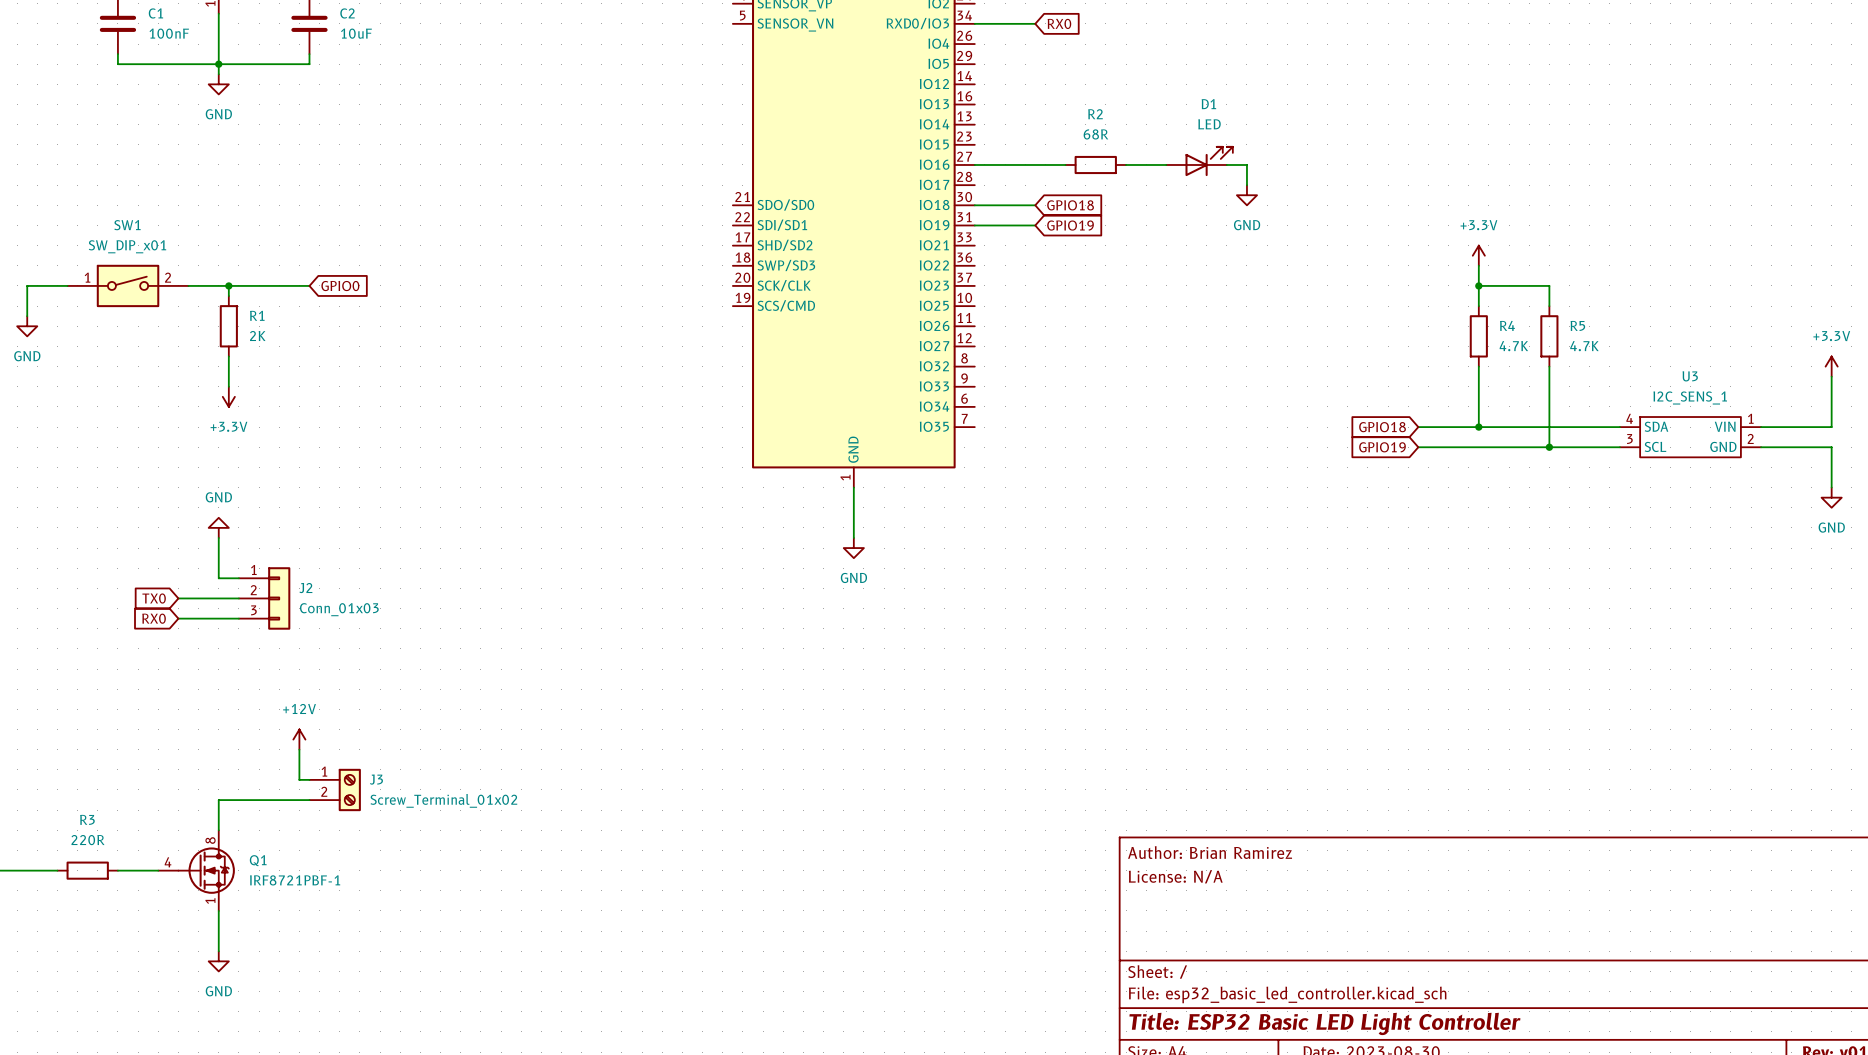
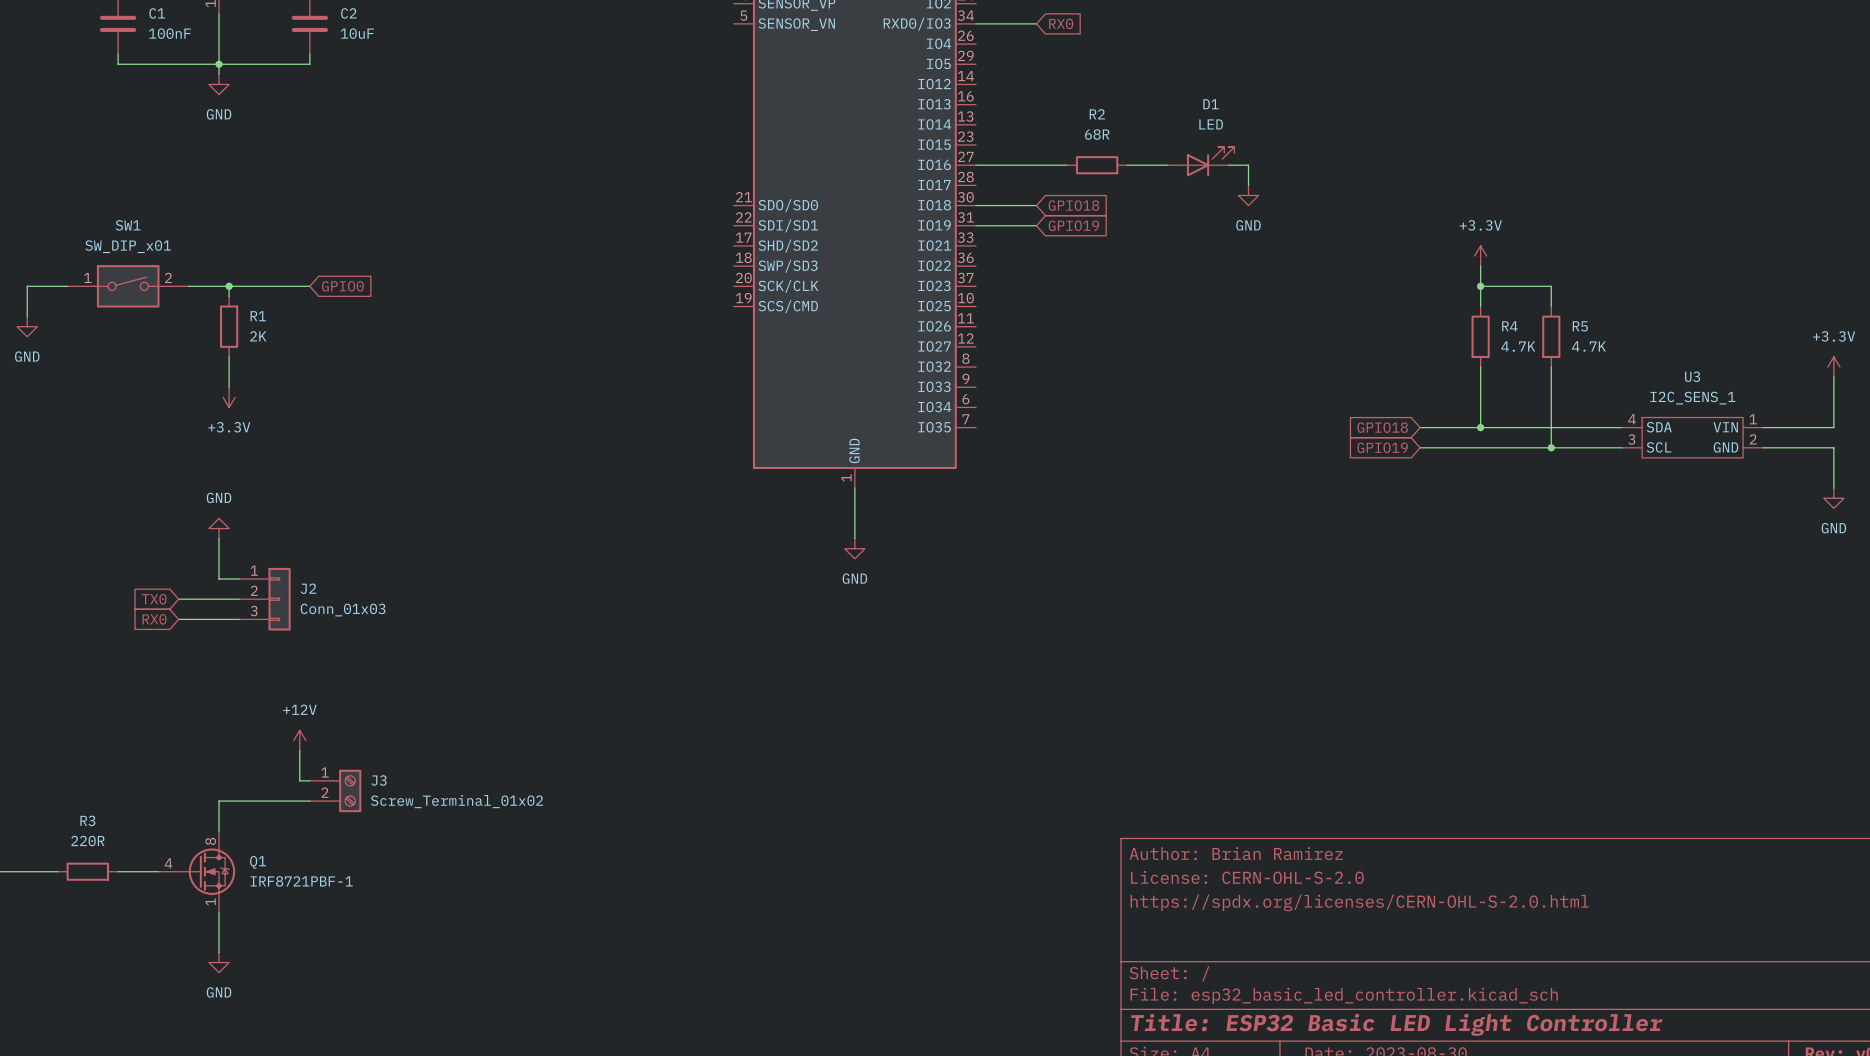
title block: License: N/A (1175, 876) -> License: CERN-OHL-S-2.0 (1247, 877)
title block: none -> https://spdx.org/licenses/CERN-OHL-S-2.0.html (1359, 902)

